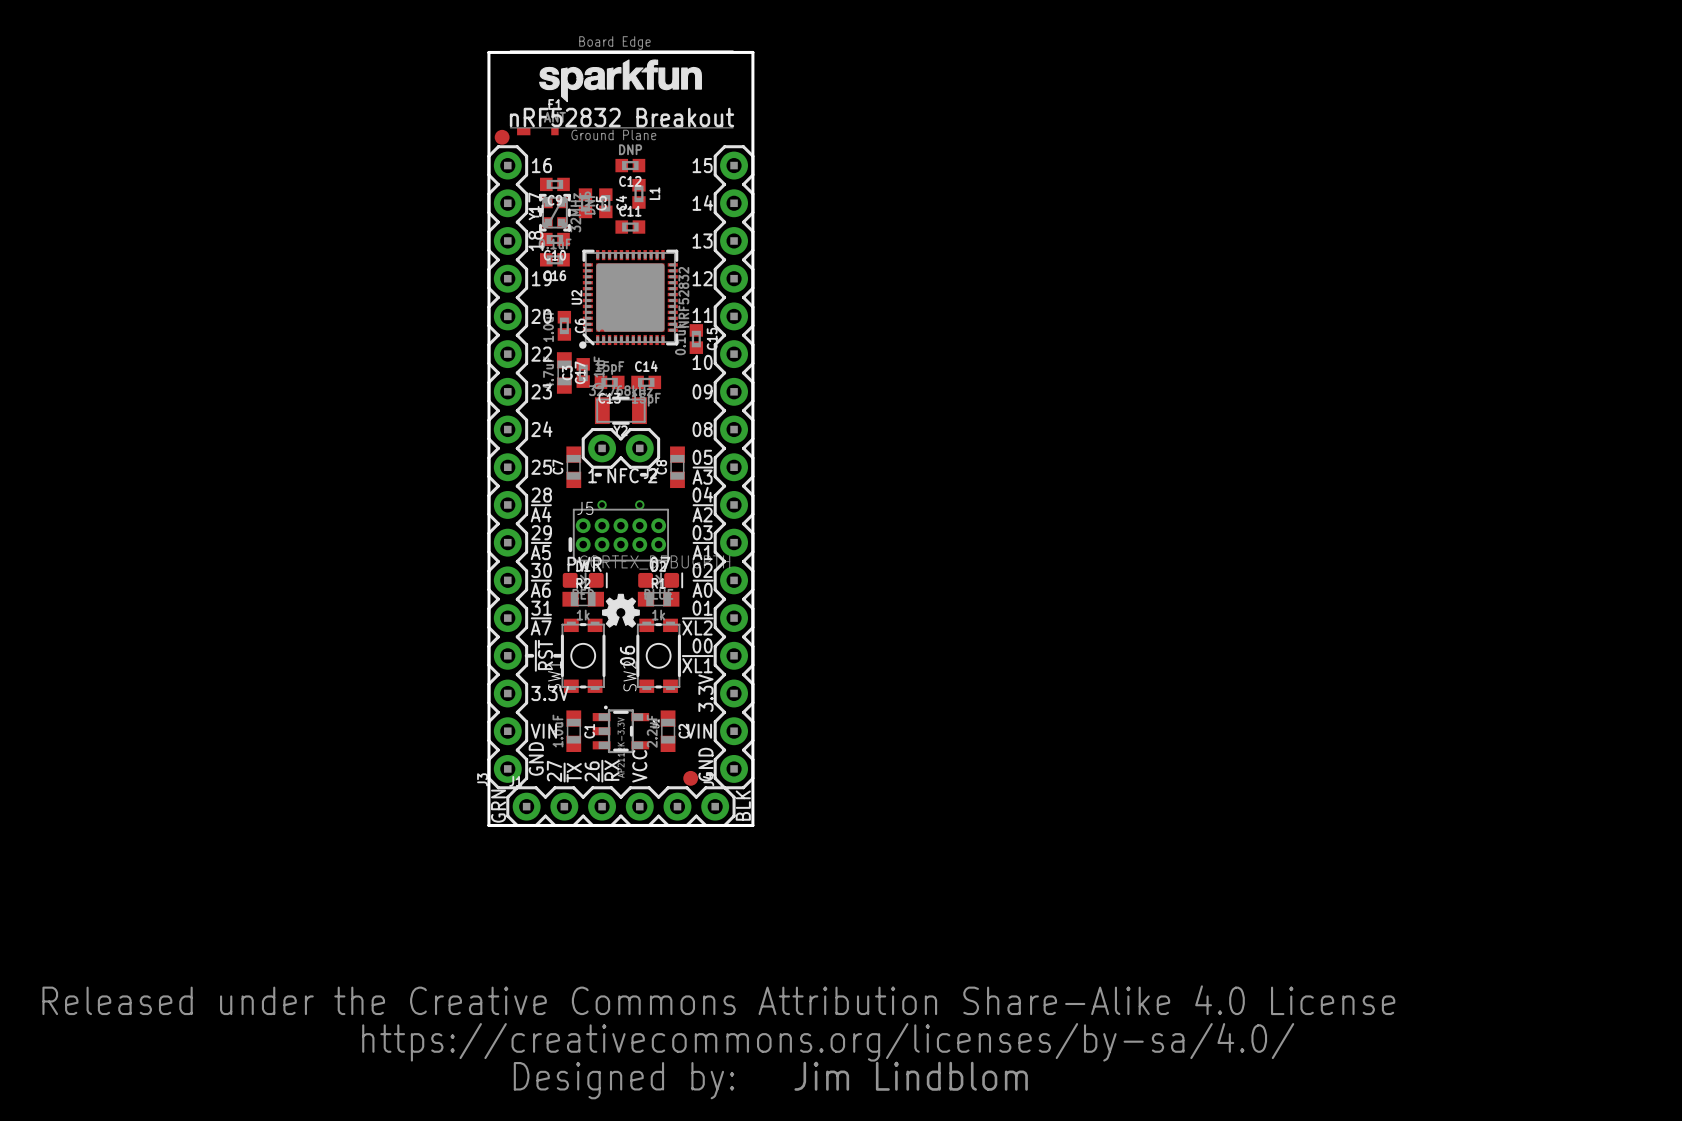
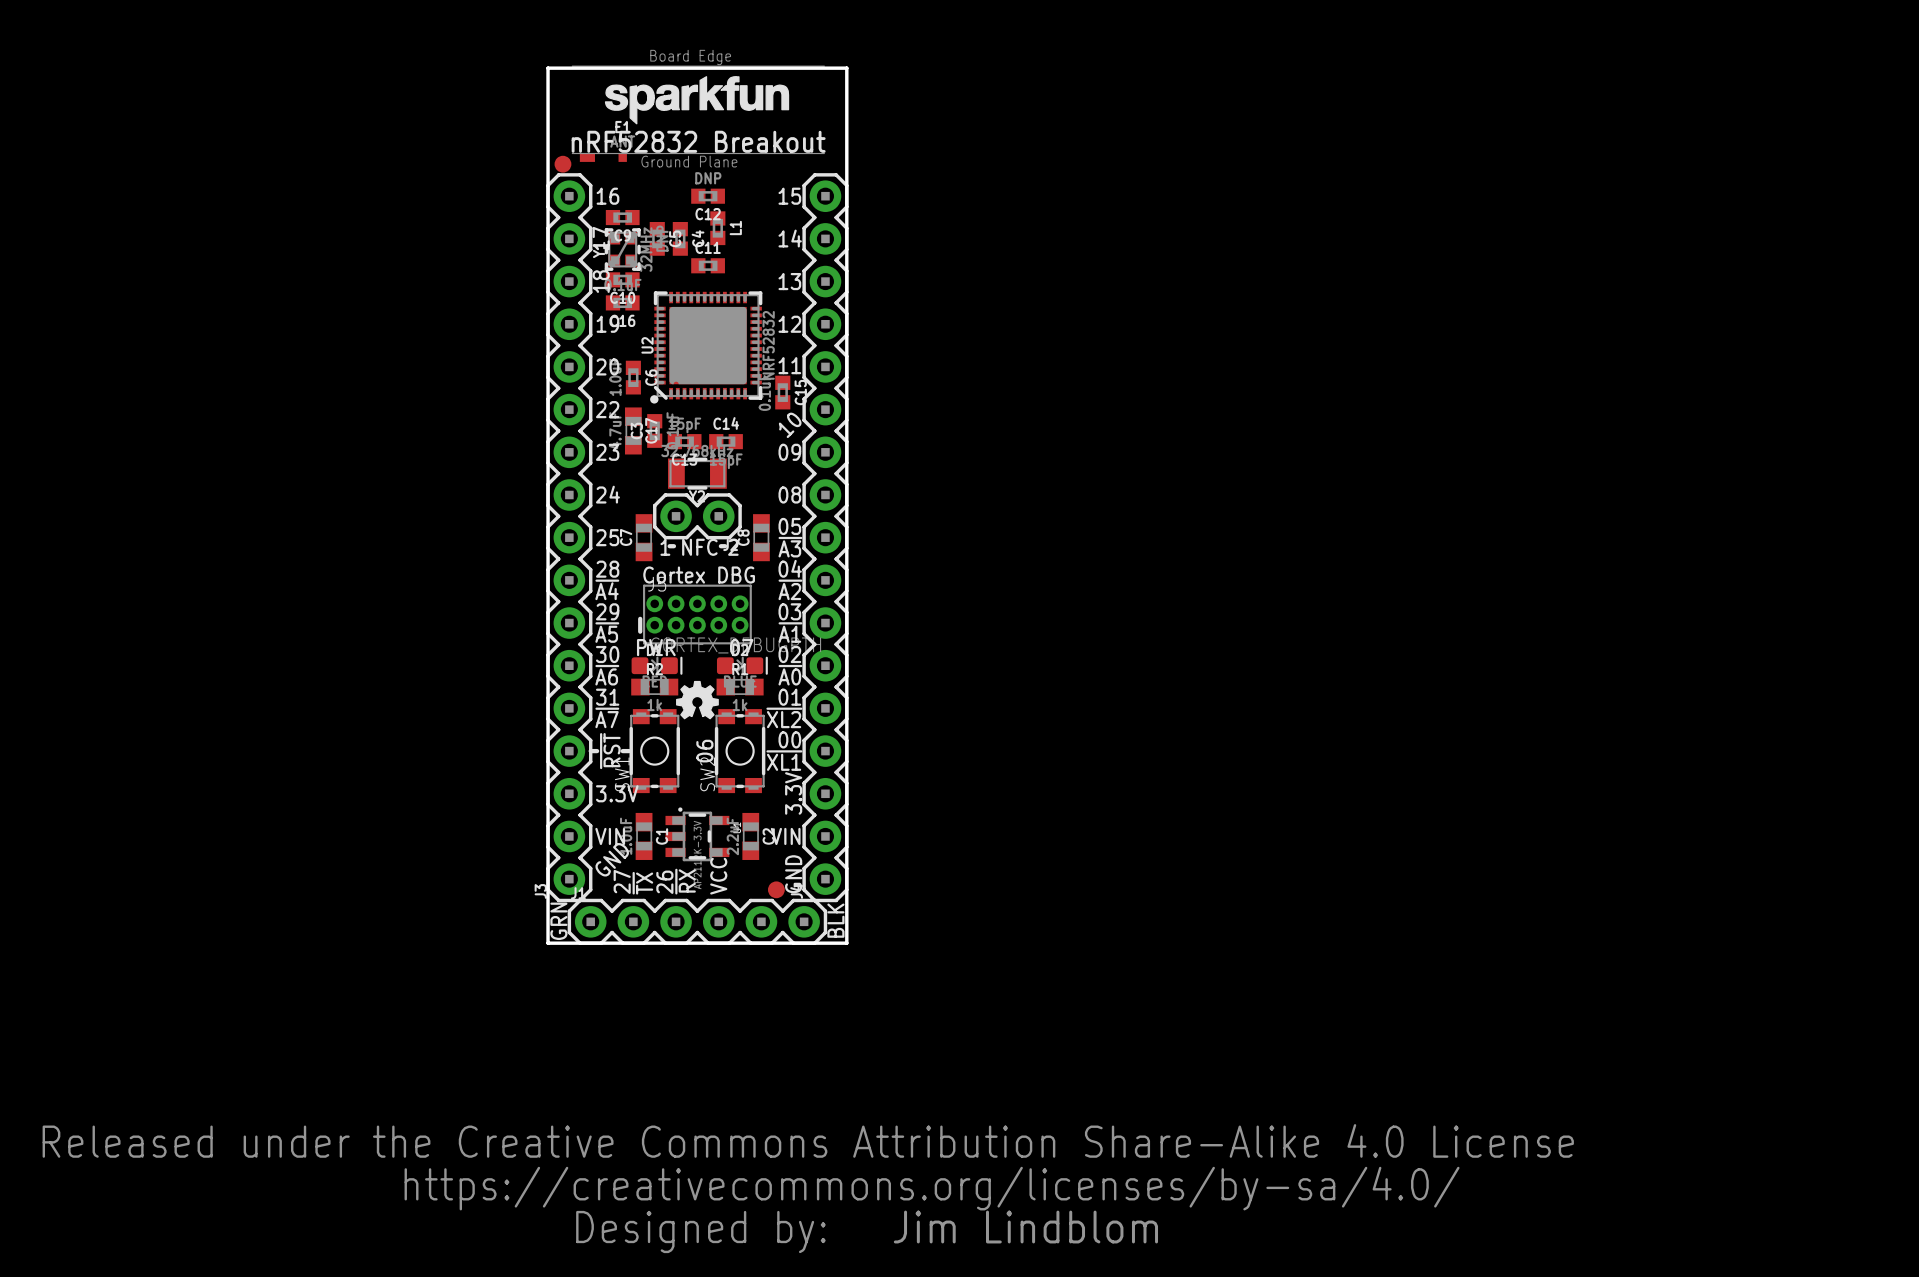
text rotation: 0° (702, 362) -> 45° counterclockwise (790, 425)
text: none -> Cortex DBG (699, 575)
part: (602, 504) -> none
part: (639, 504) -> none
text rotation: 0° (536, 758) -> 45° clockwise (612, 859)

